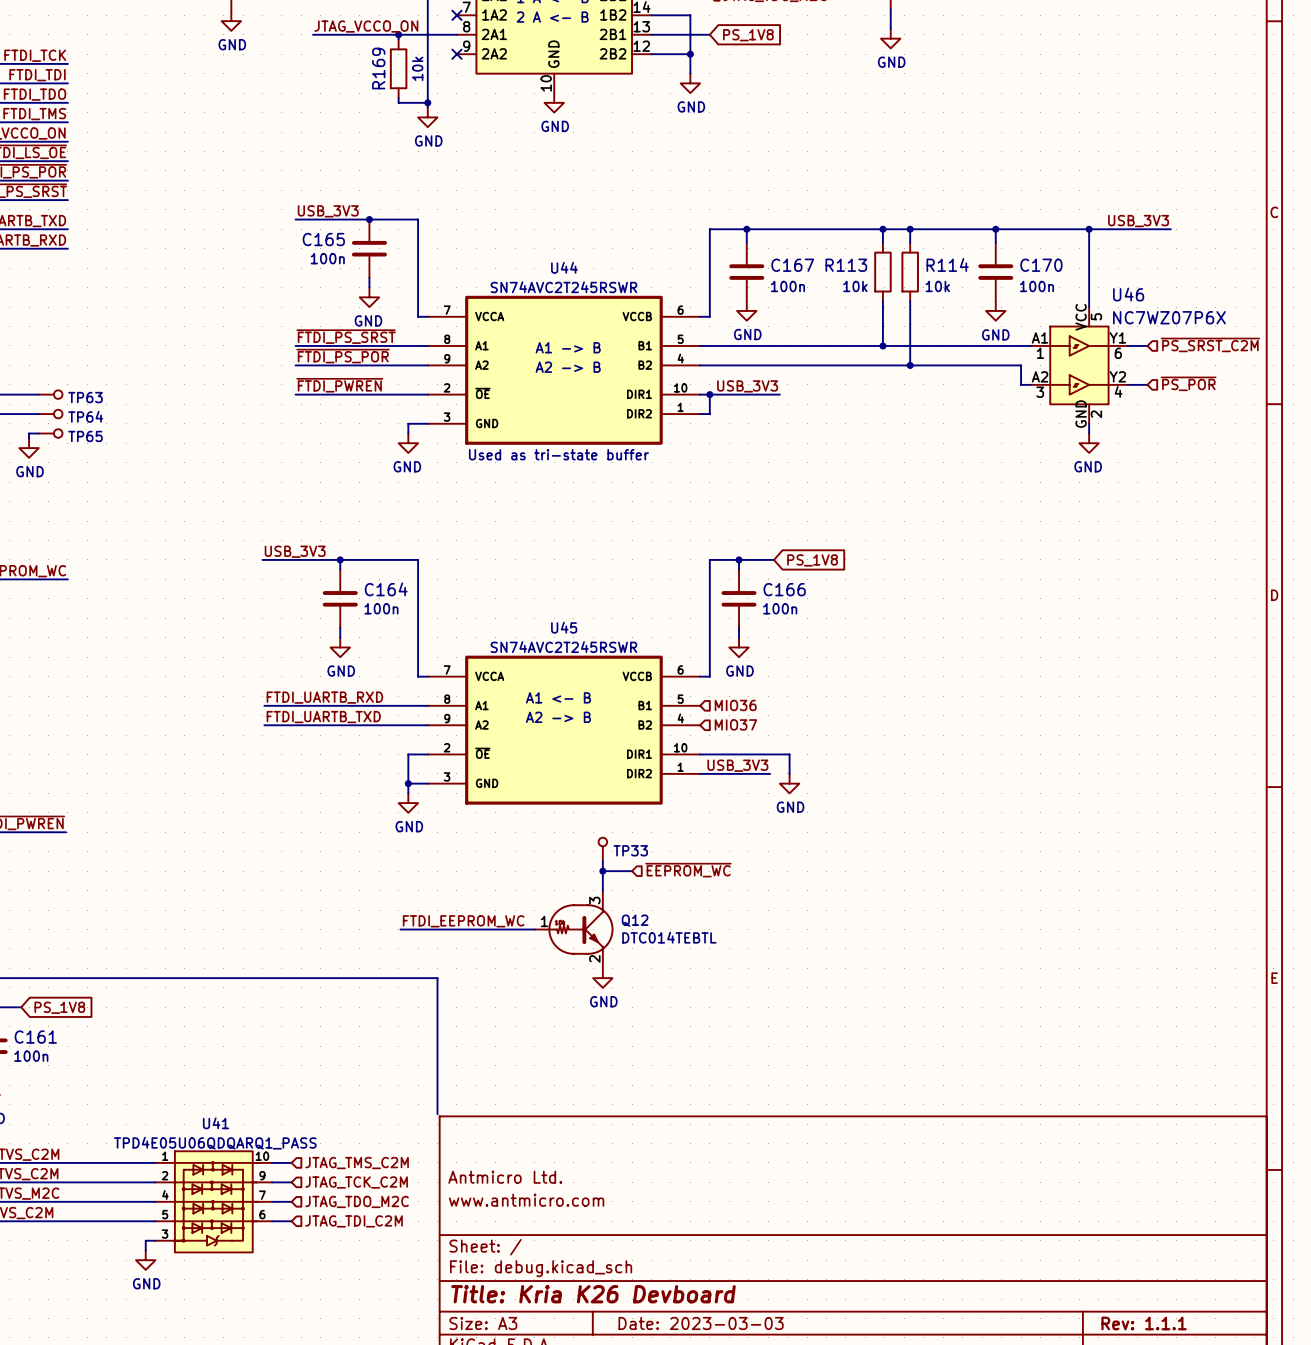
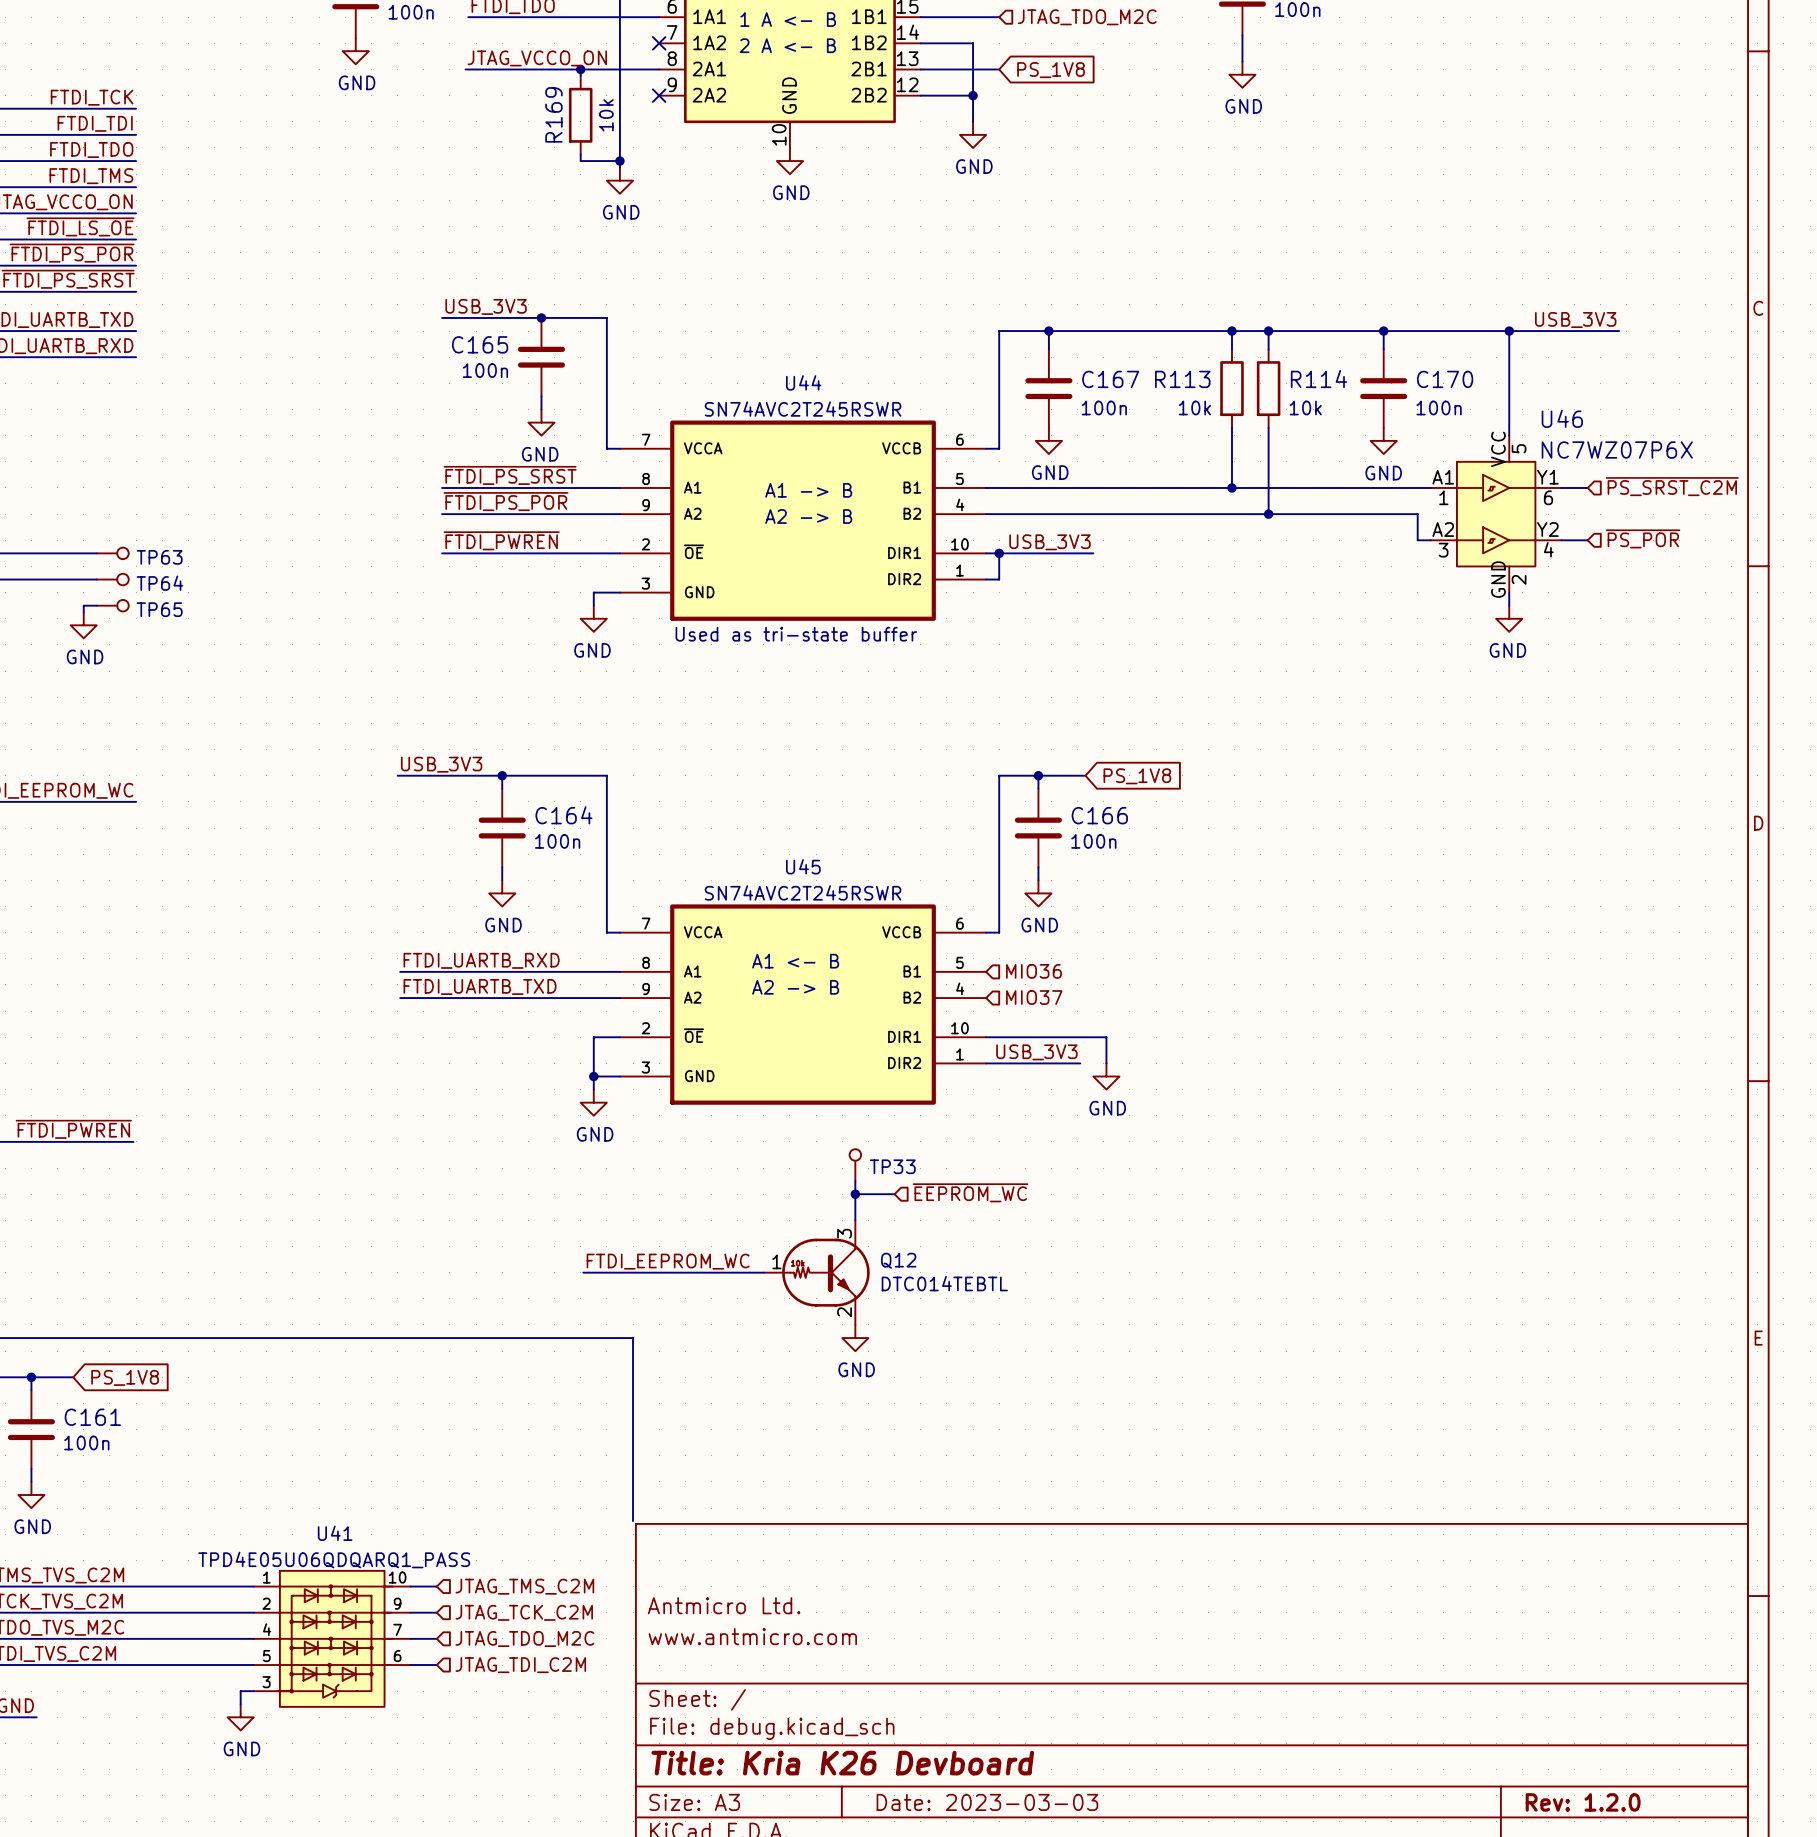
title block: Rev: 1.1.1 (1144, 1323) -> Rev: 1.2.0 (1583, 1802)

